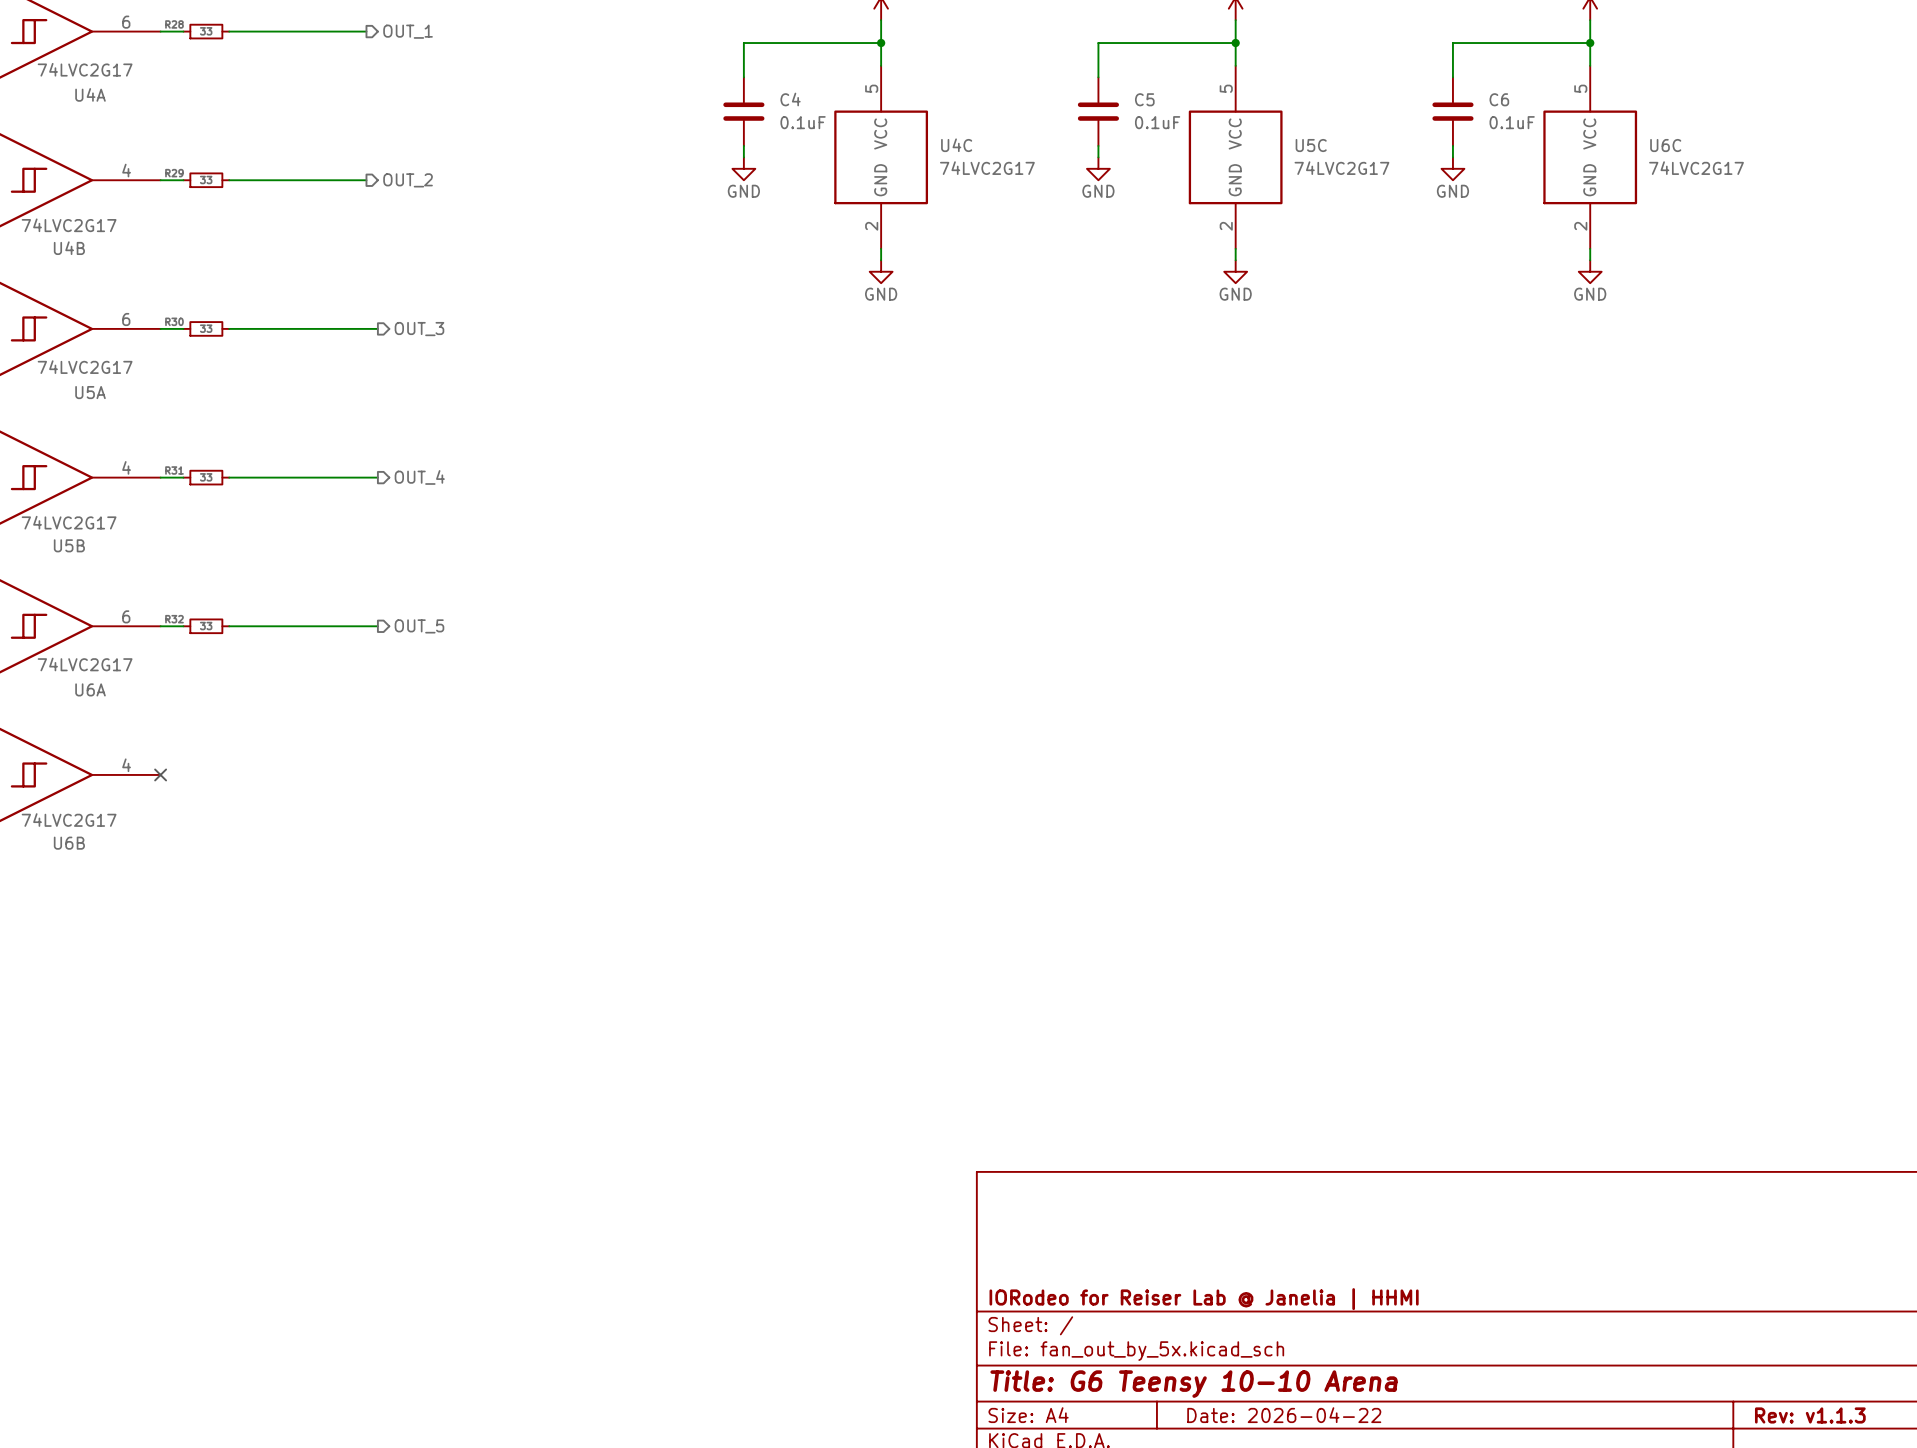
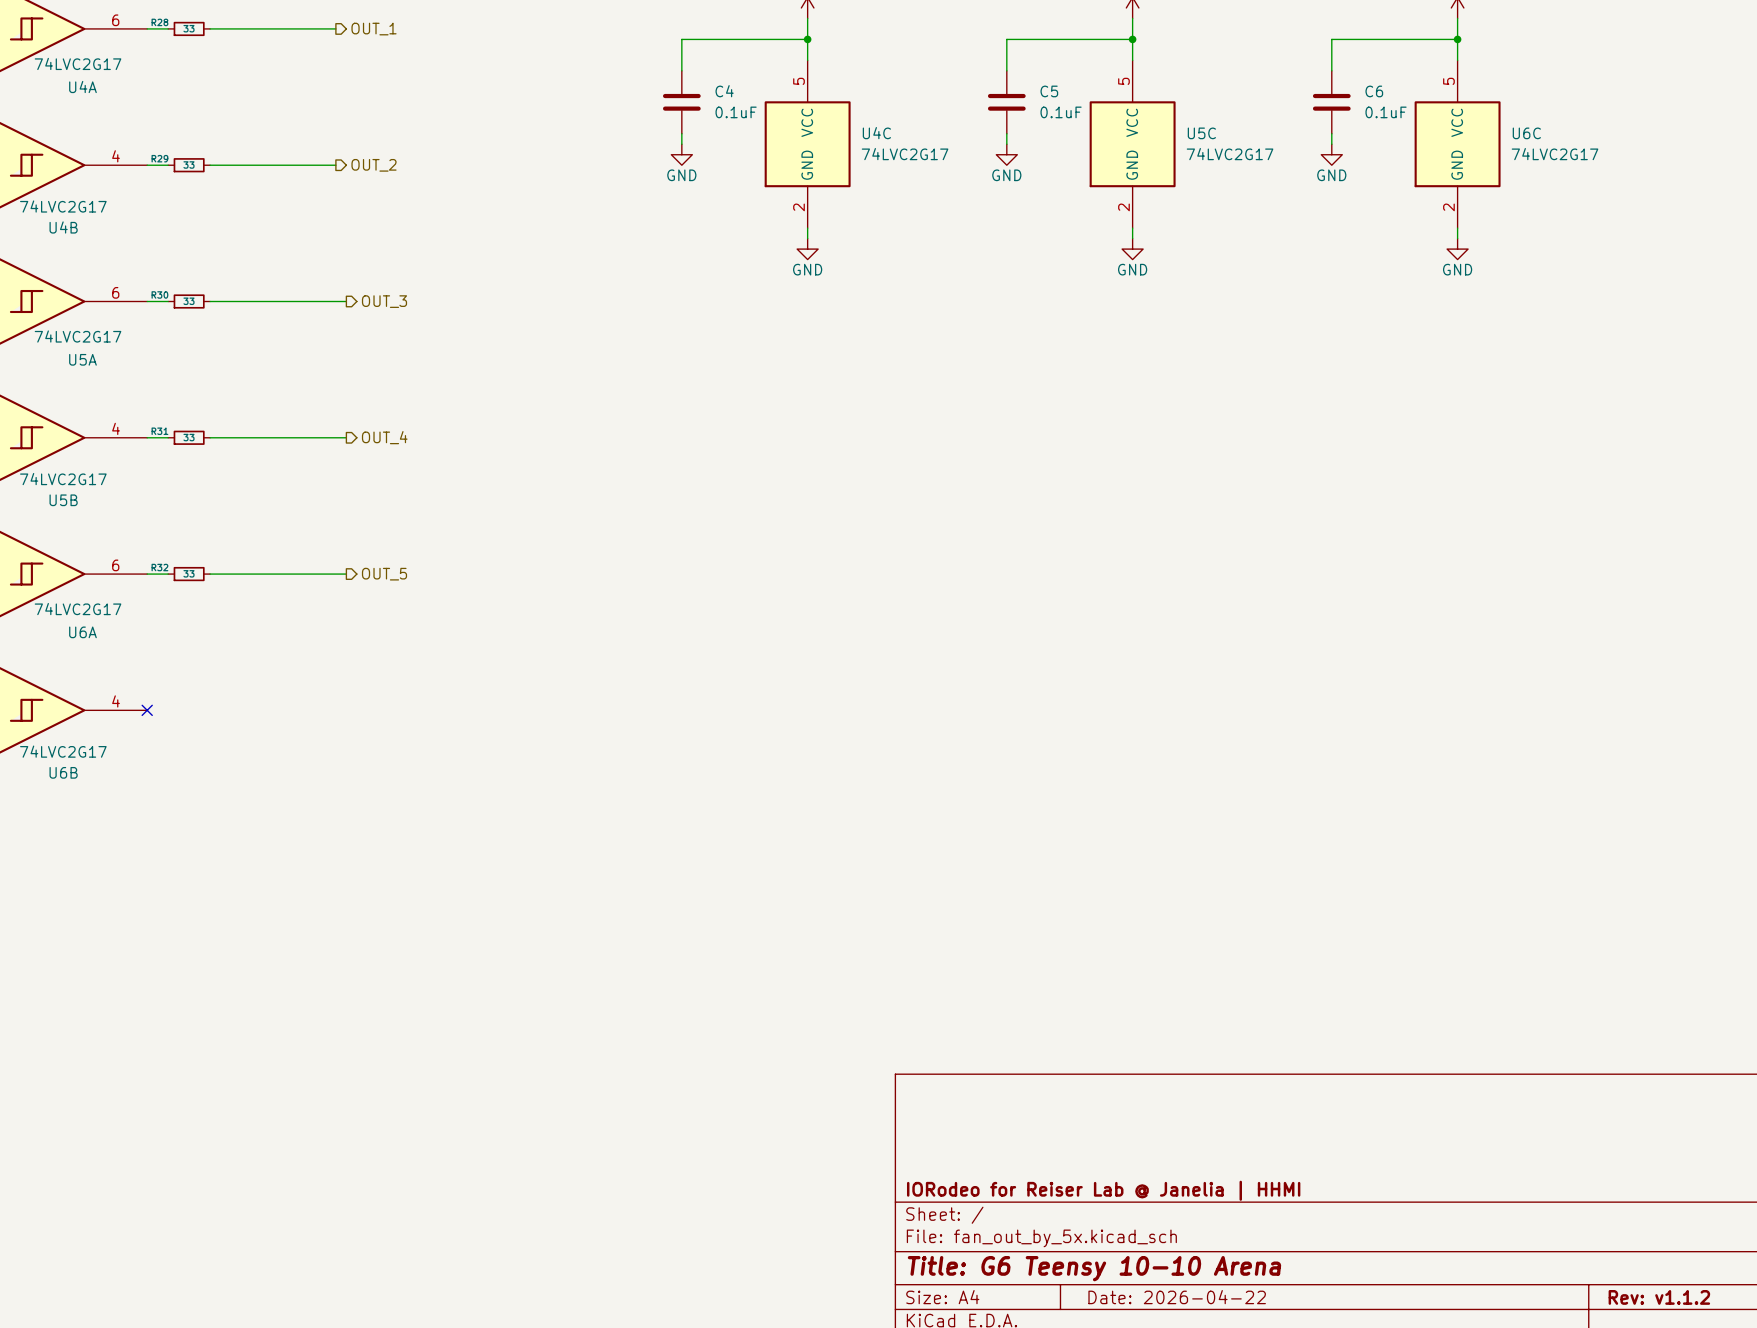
title block: Rev: v1.1.3 (1810, 1415) -> Rev: v1.1.2 (1659, 1297)

